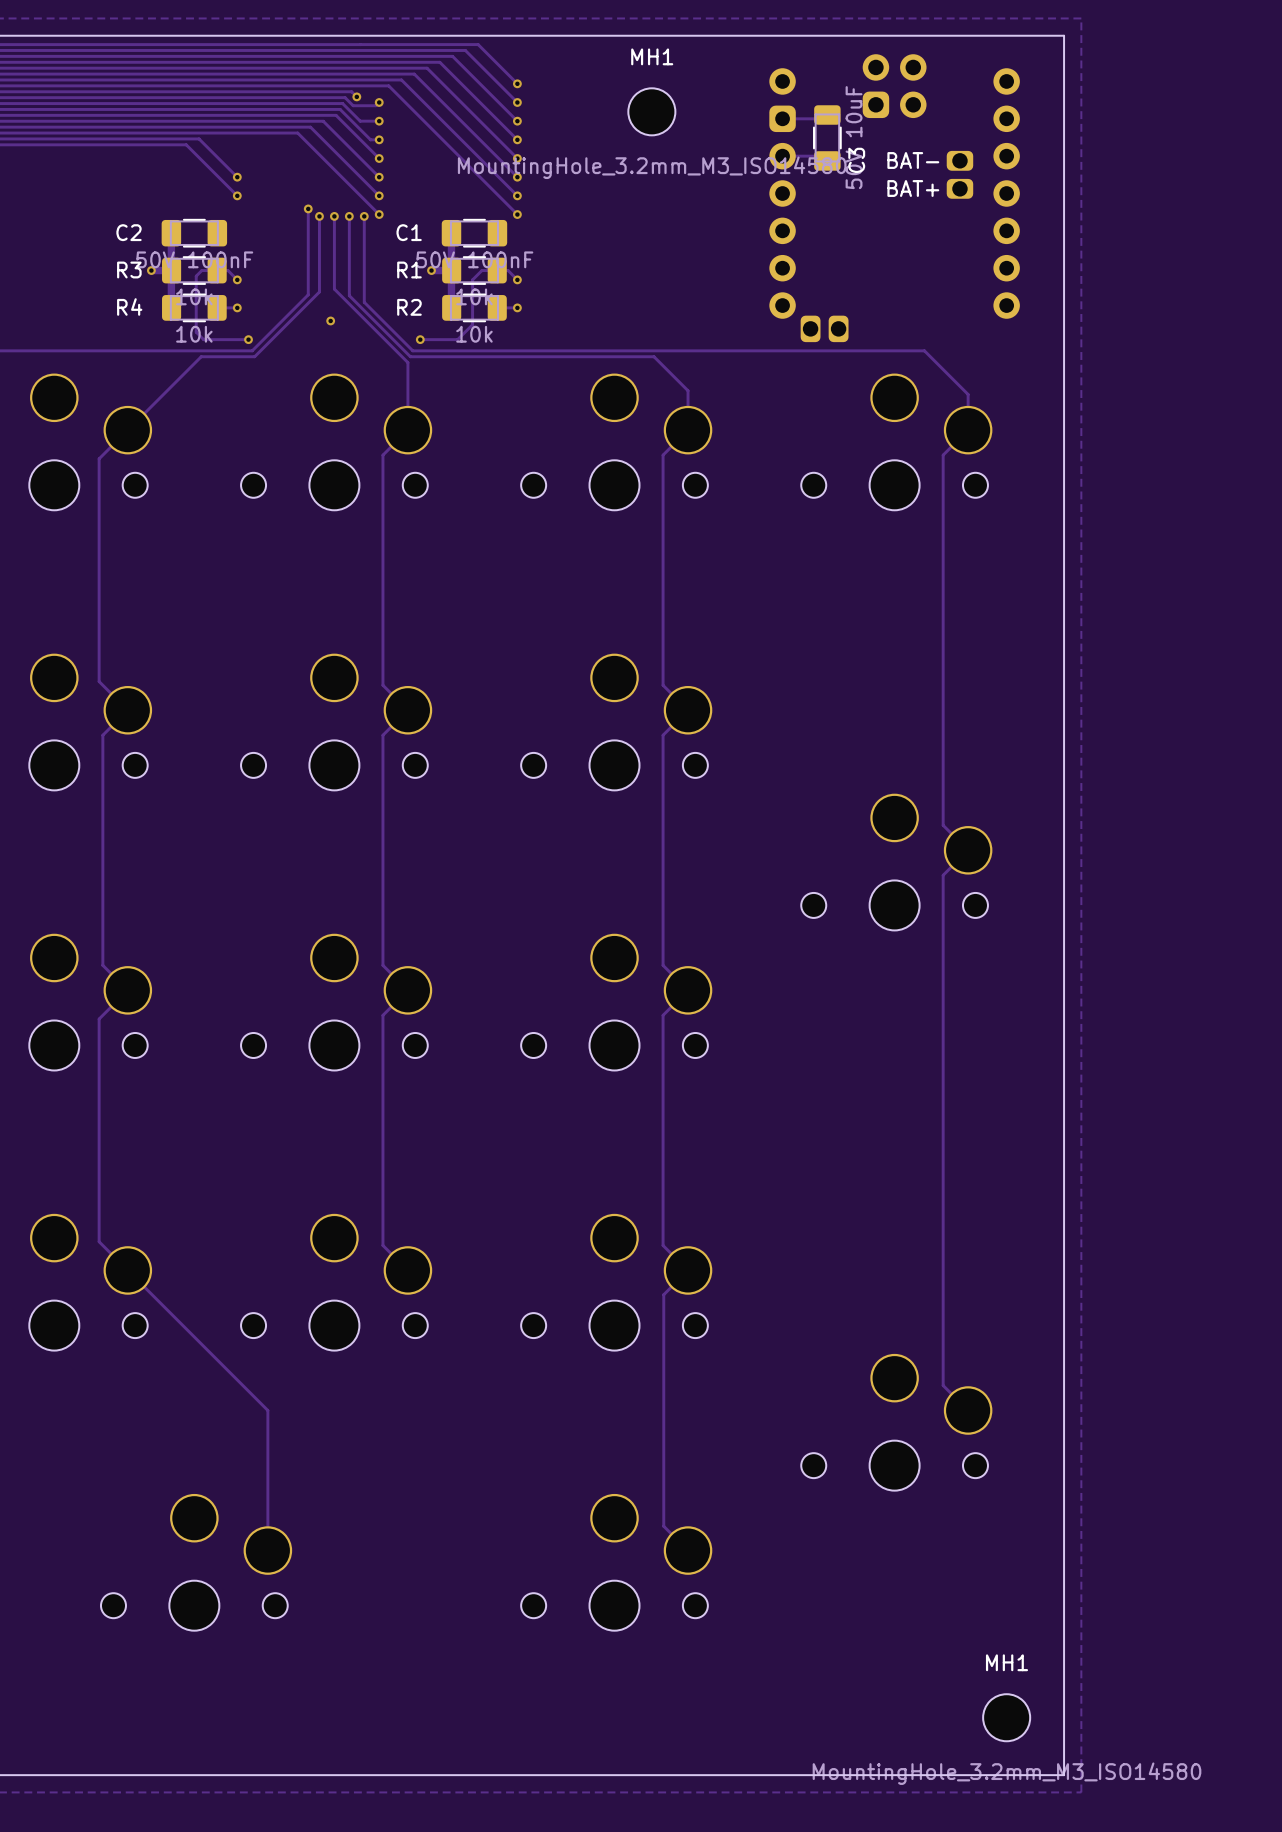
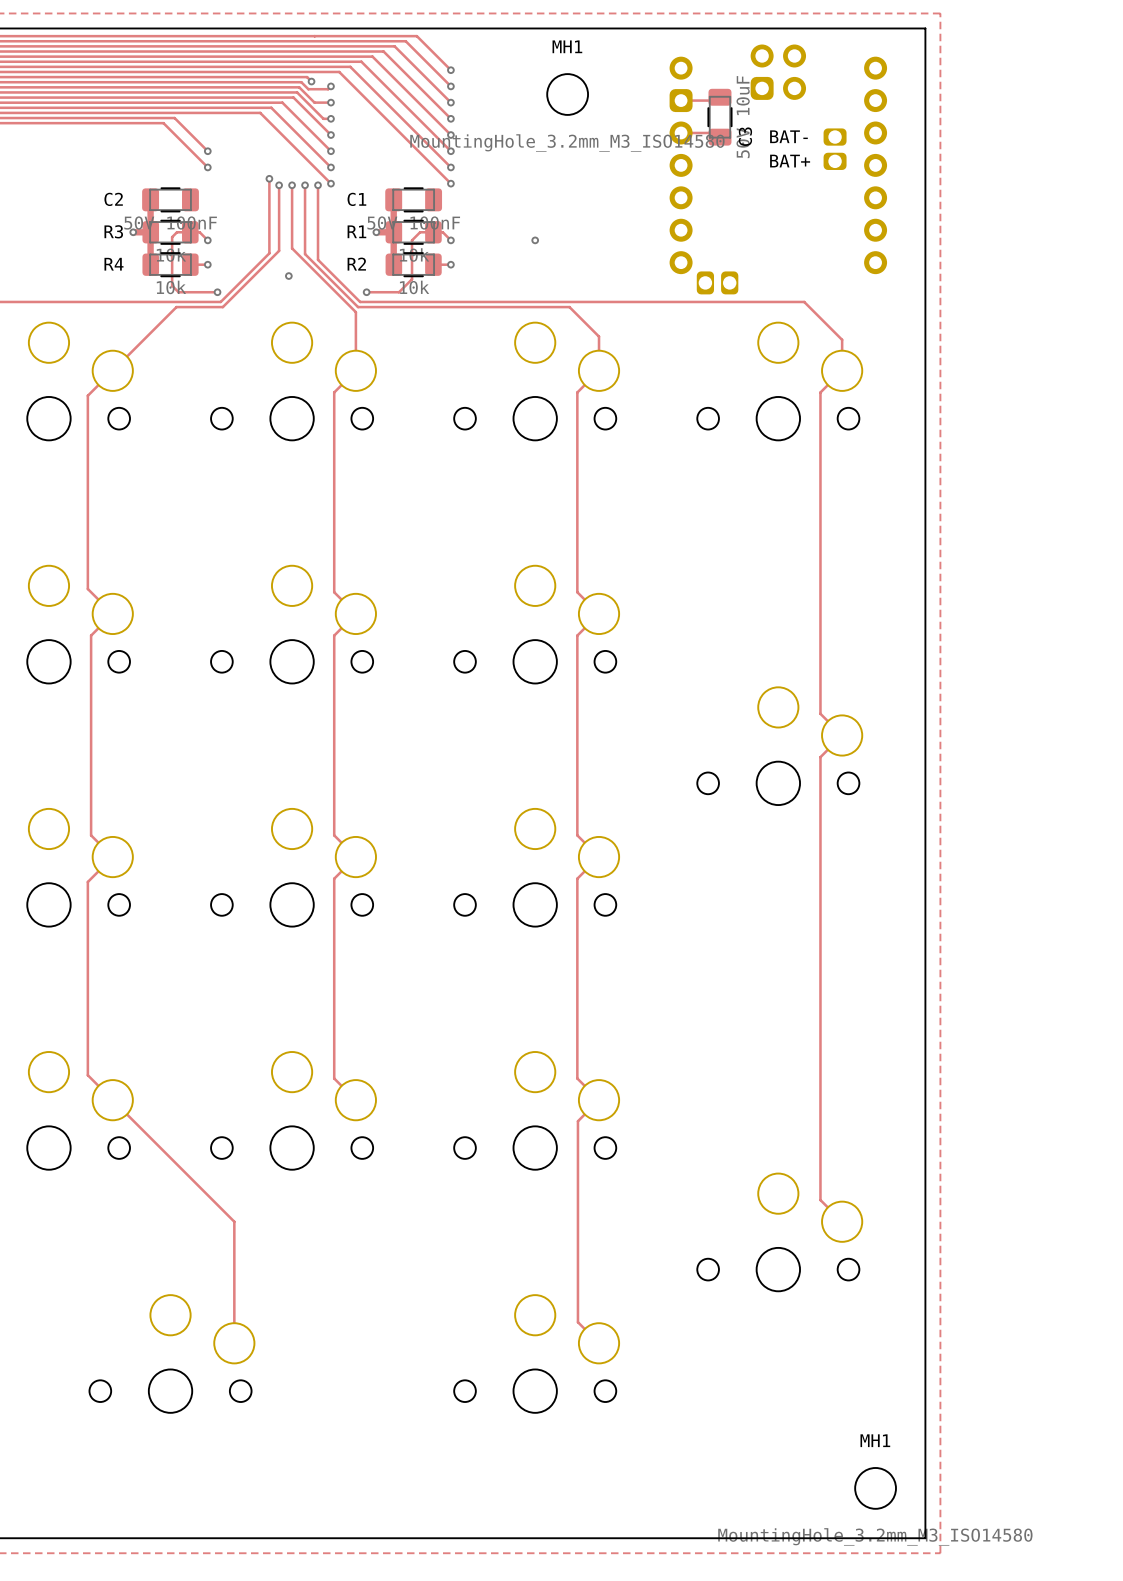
via: none -> (535, 240)

